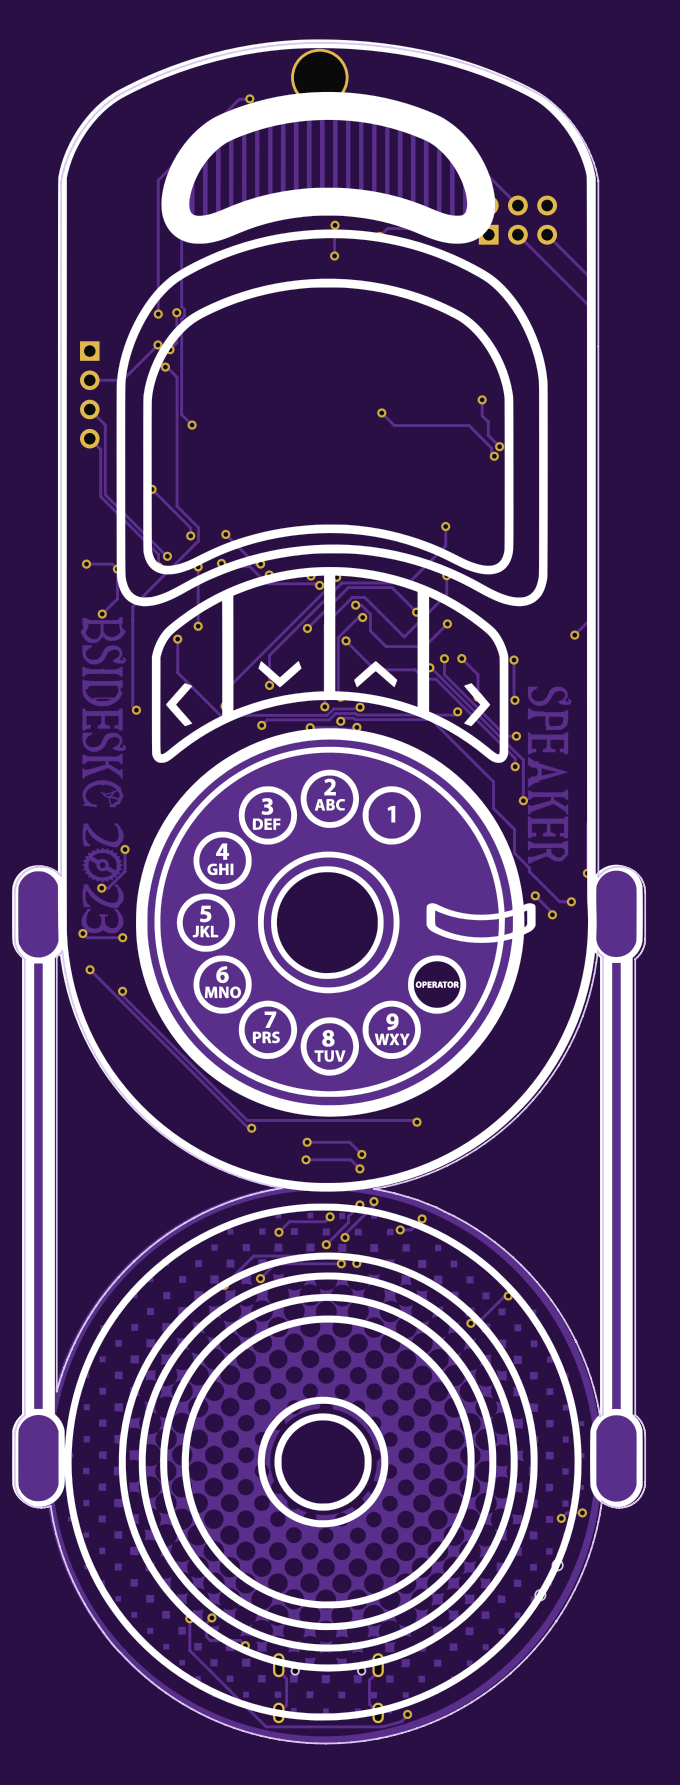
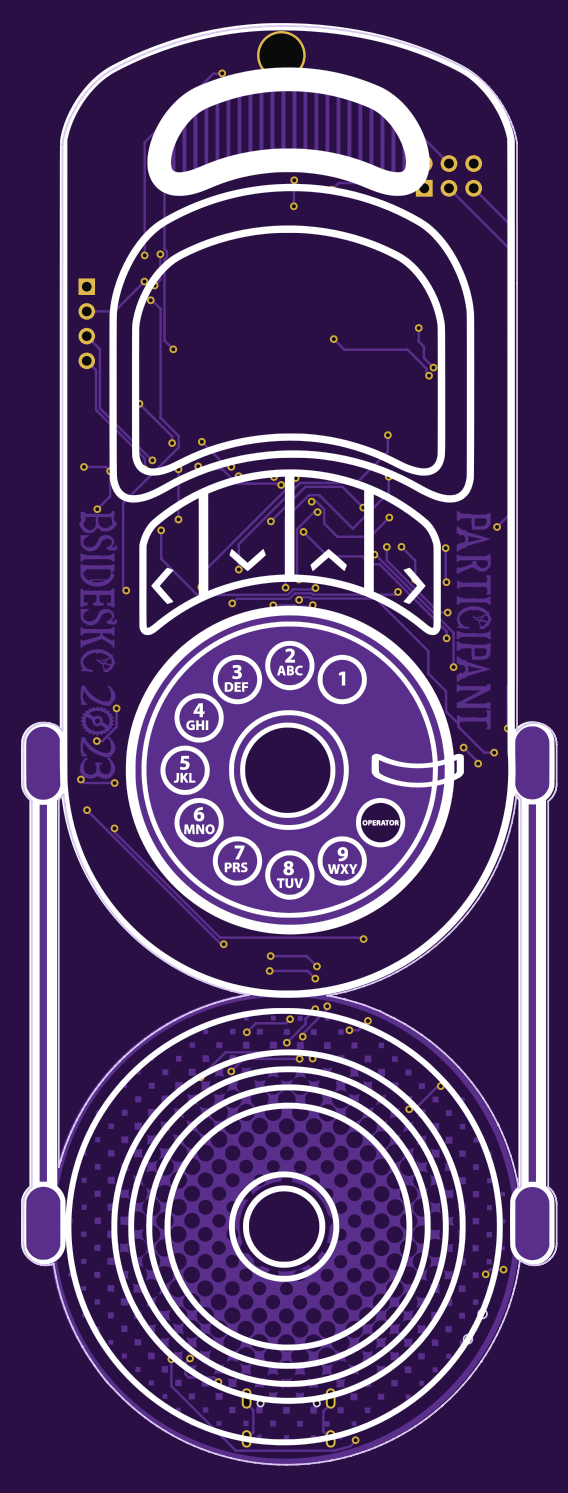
drawing shape: [80, 617, 572, 934] -> [78, 511, 493, 779]

